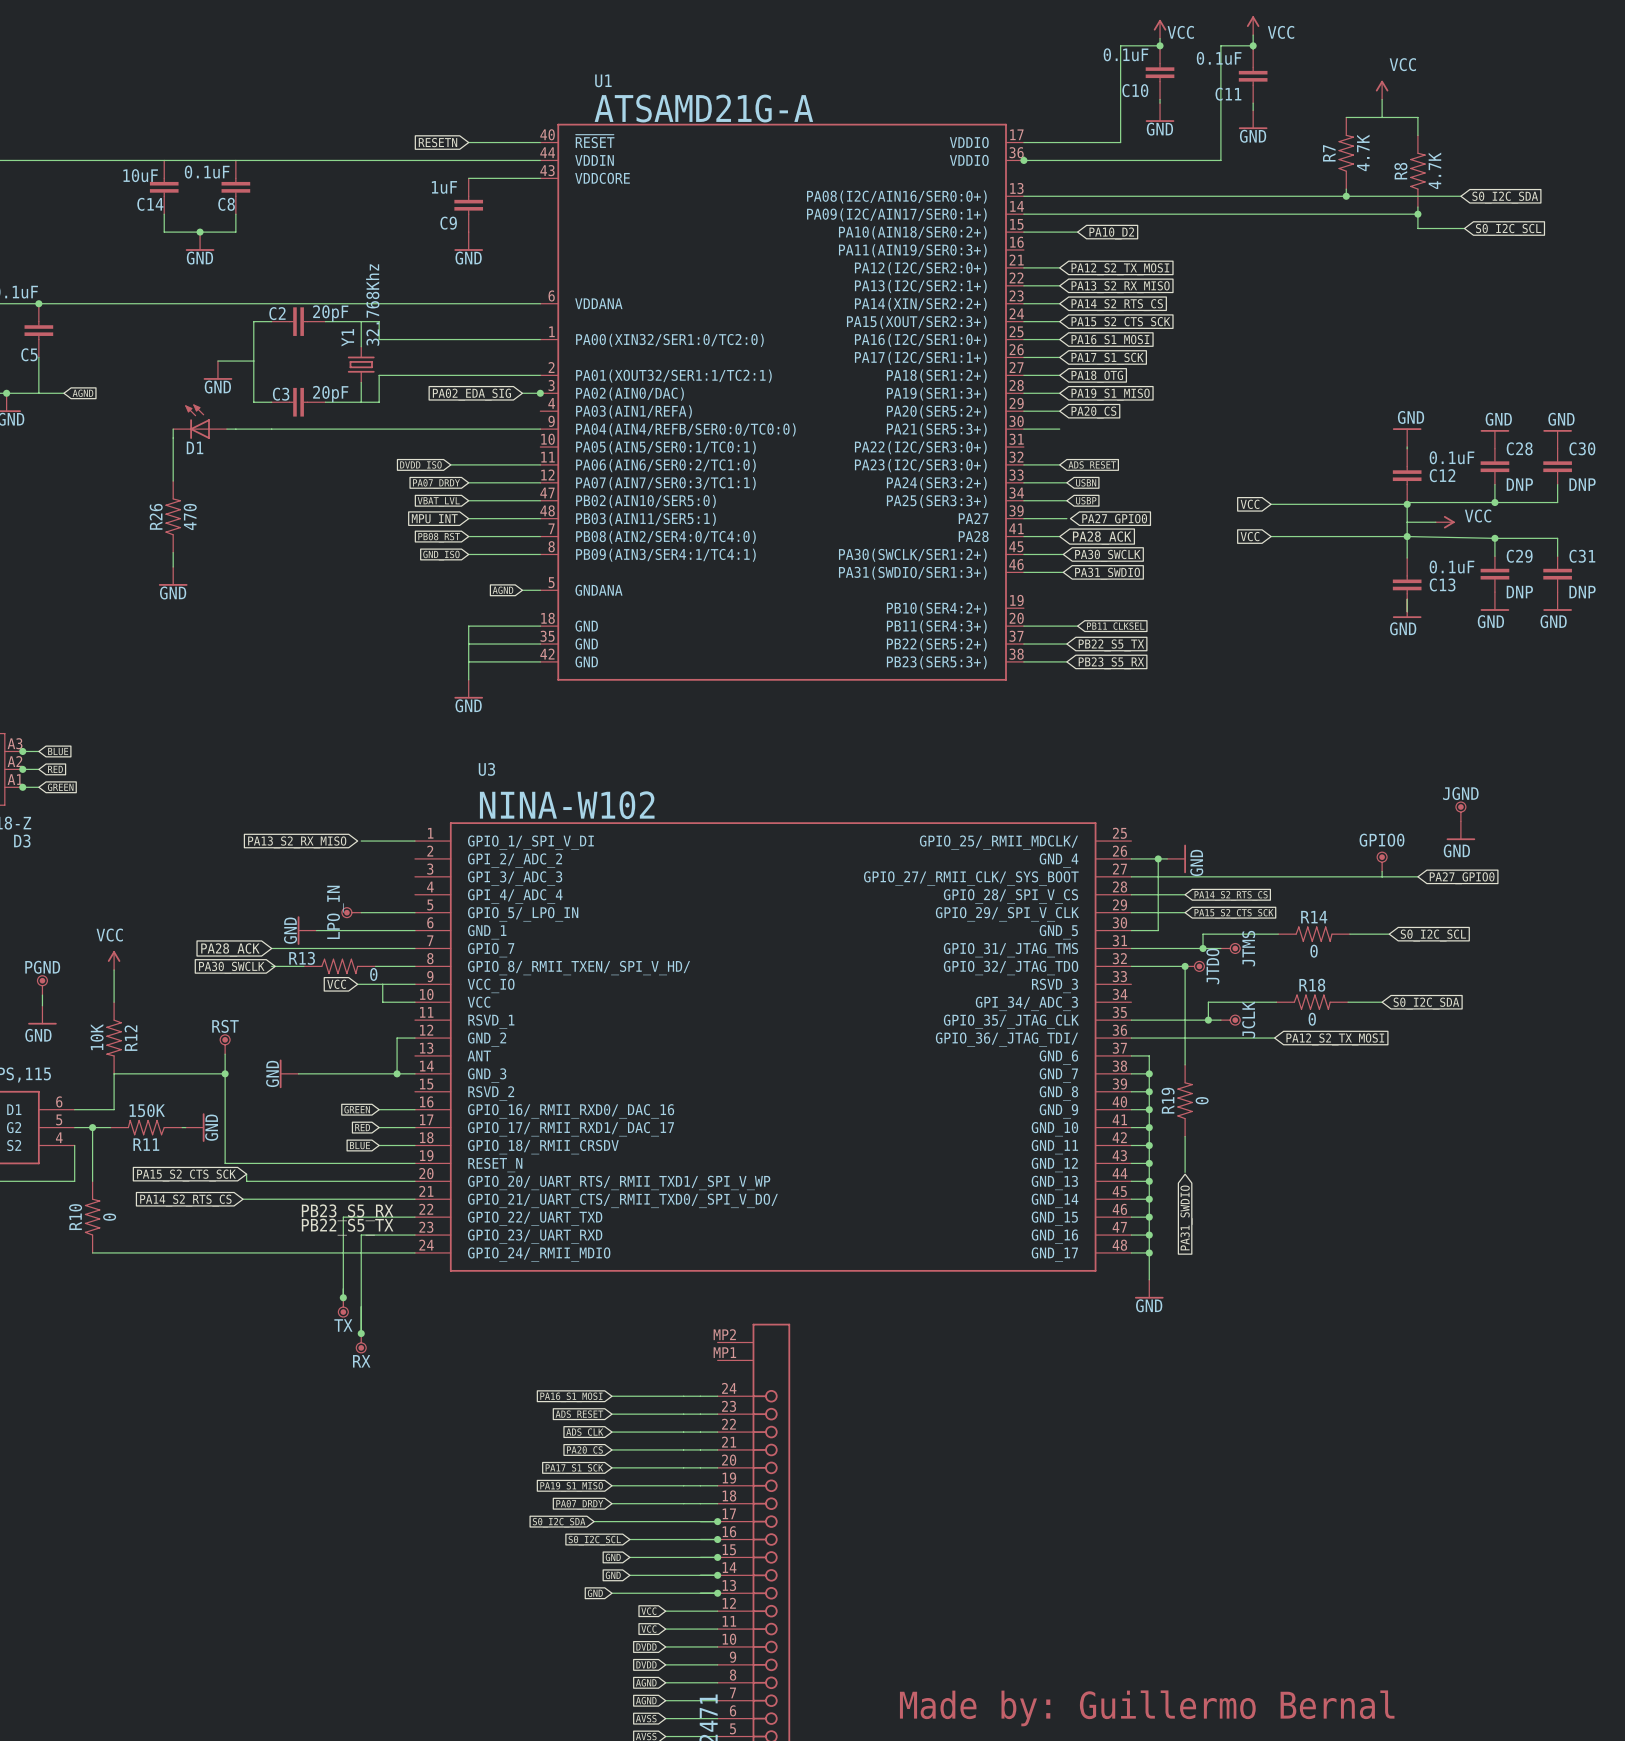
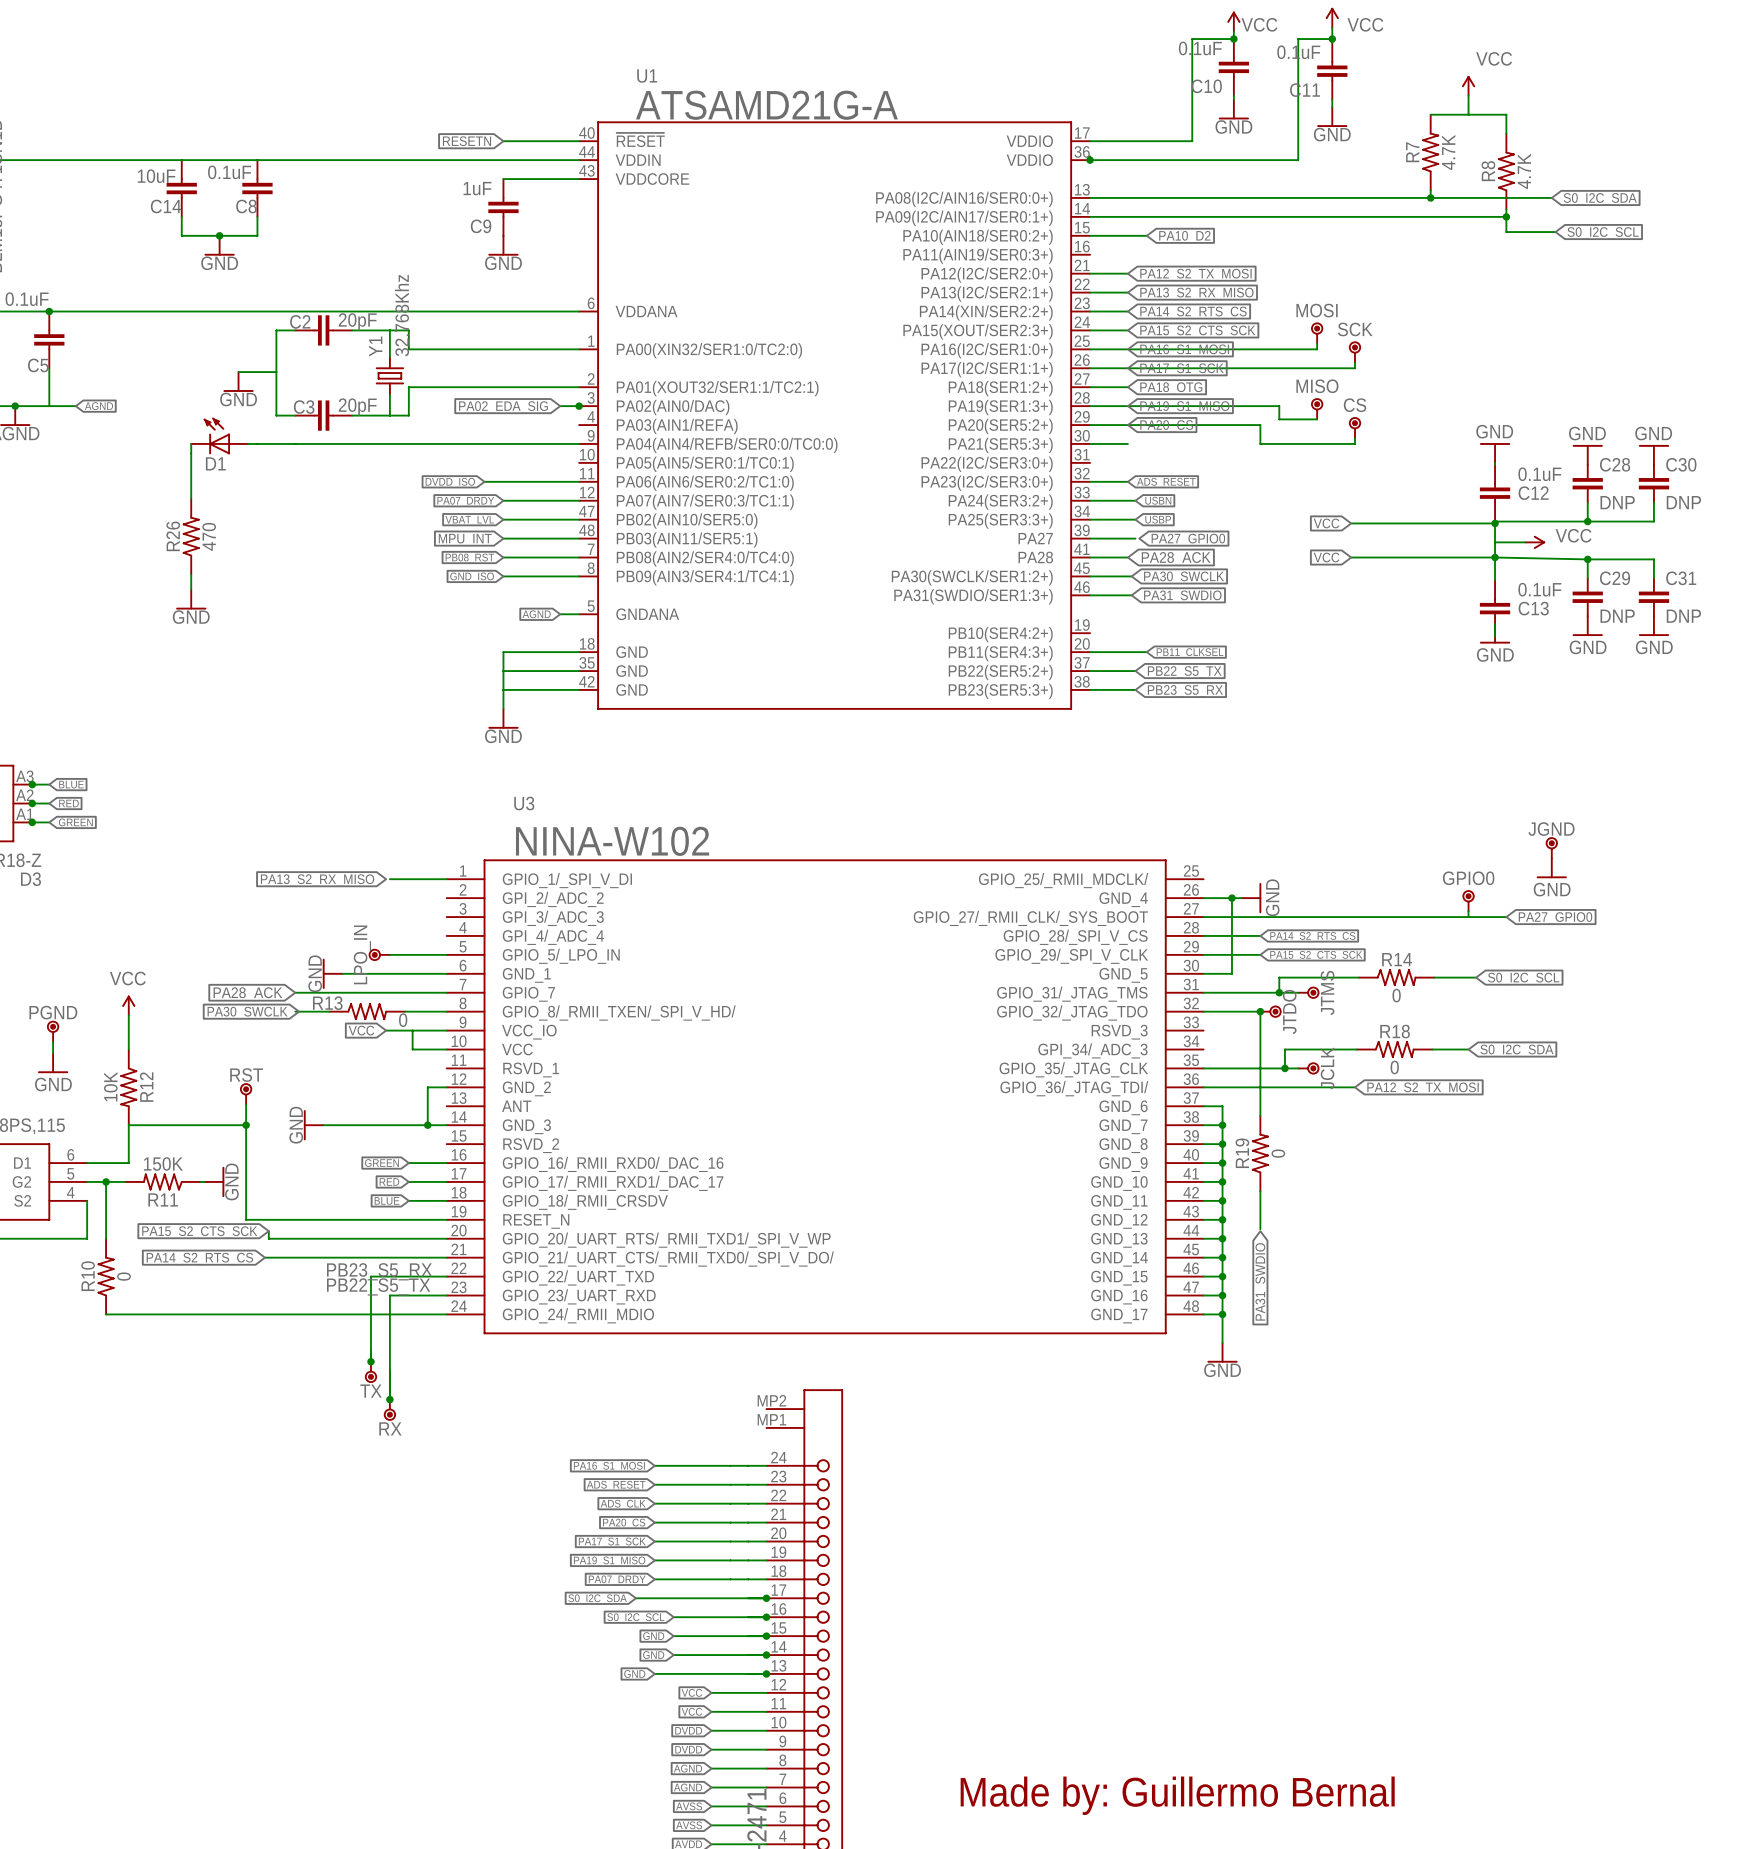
MOSI: none -> (1317, 333)
wire: none -> (1317, 343) (1317, 349) (1127, 349)
SCK: none -> (1354, 352)
wire: none -> (1354, 362) (1354, 368) (1127, 368)
wire: none -> (1127, 406) (1279, 406) (1279, 419) (1317, 419)
MISO: none -> (1317, 409)
wire: none -> (1127, 425) (1260, 425) (1260, 443) (1354, 443) (1354, 438)
CS: none -> (1354, 428)

